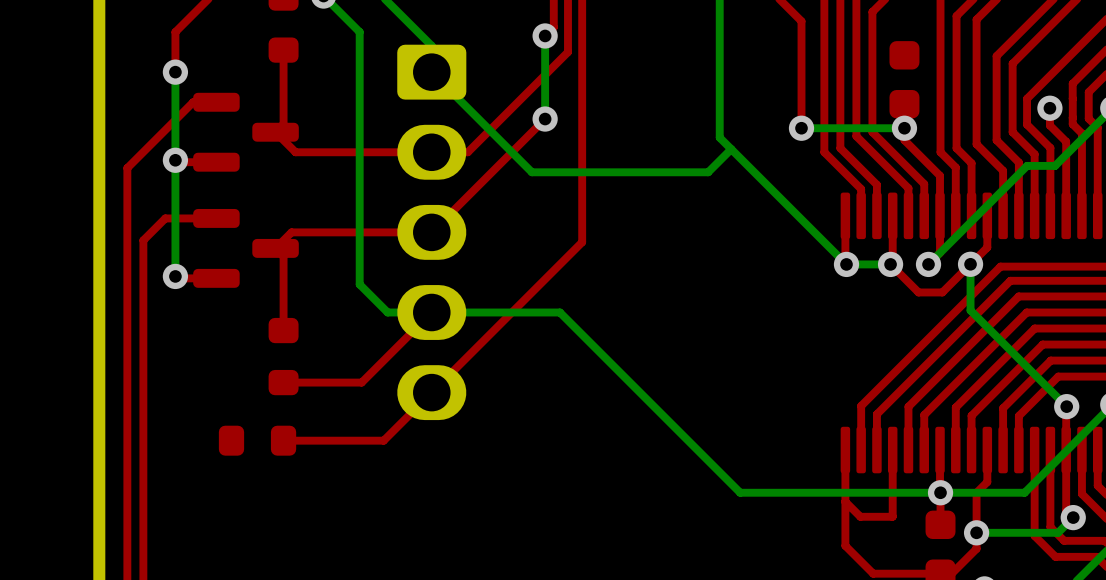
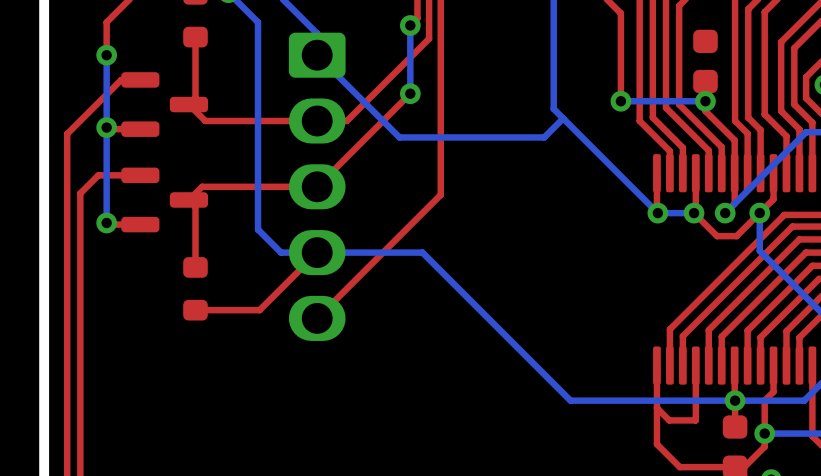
top track: (431, 392) (383, 440) (283, 440) -> none
part: (257, 440) -> none

